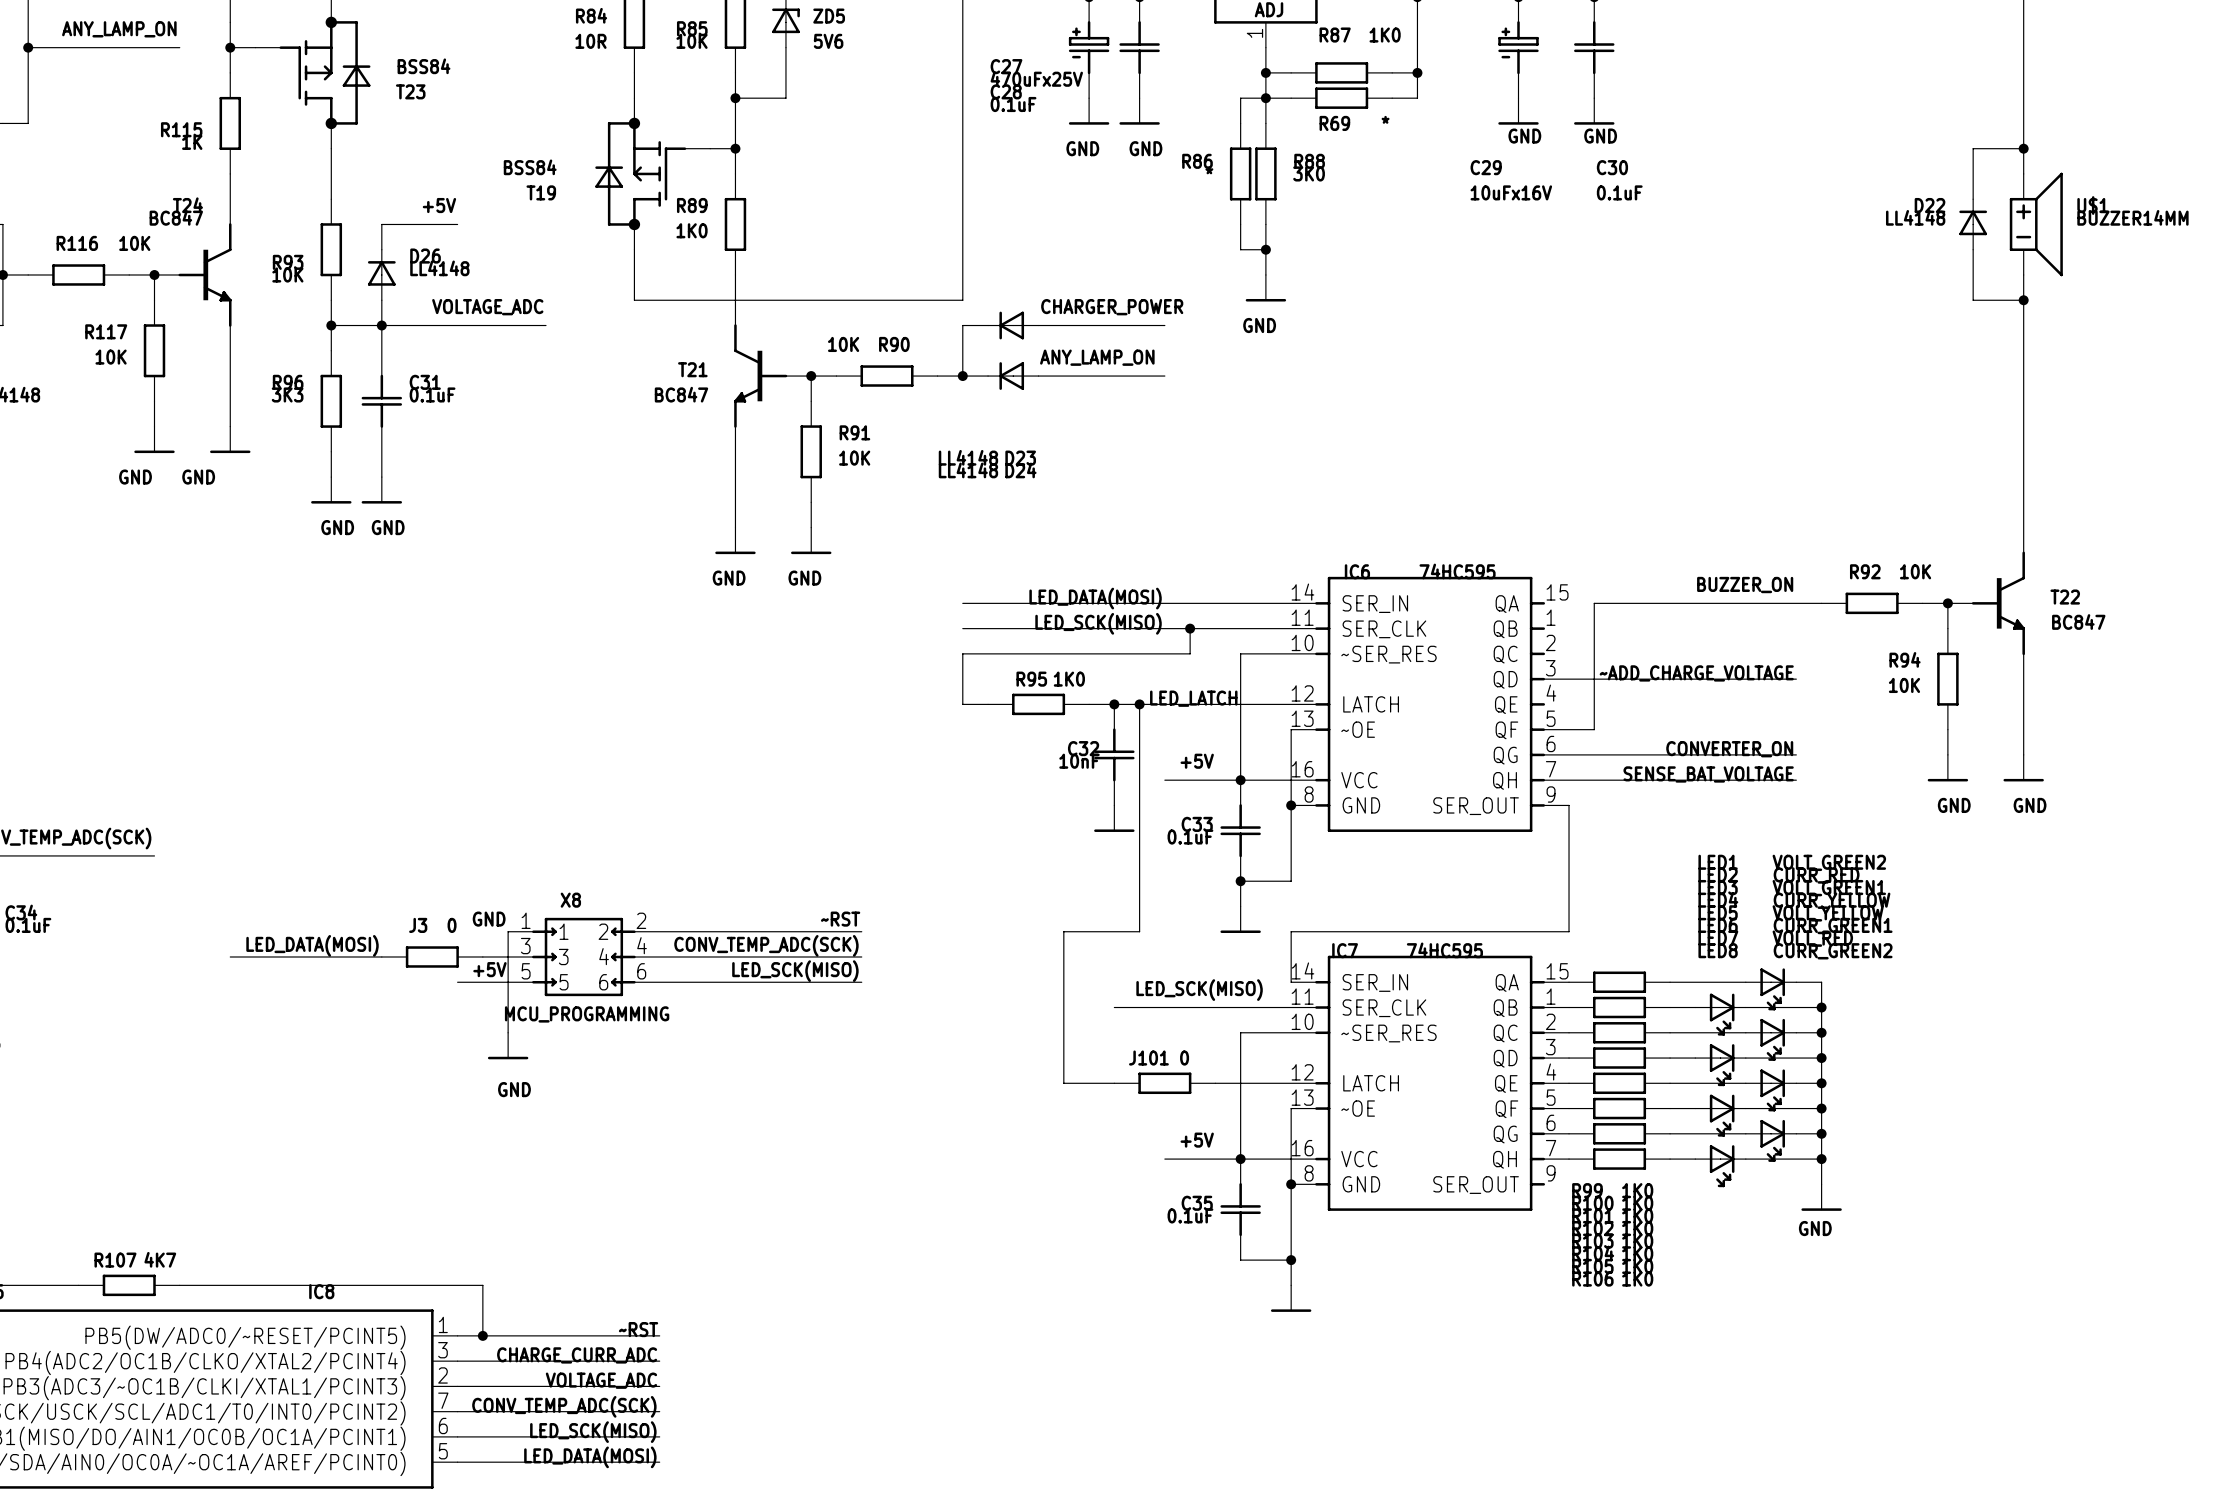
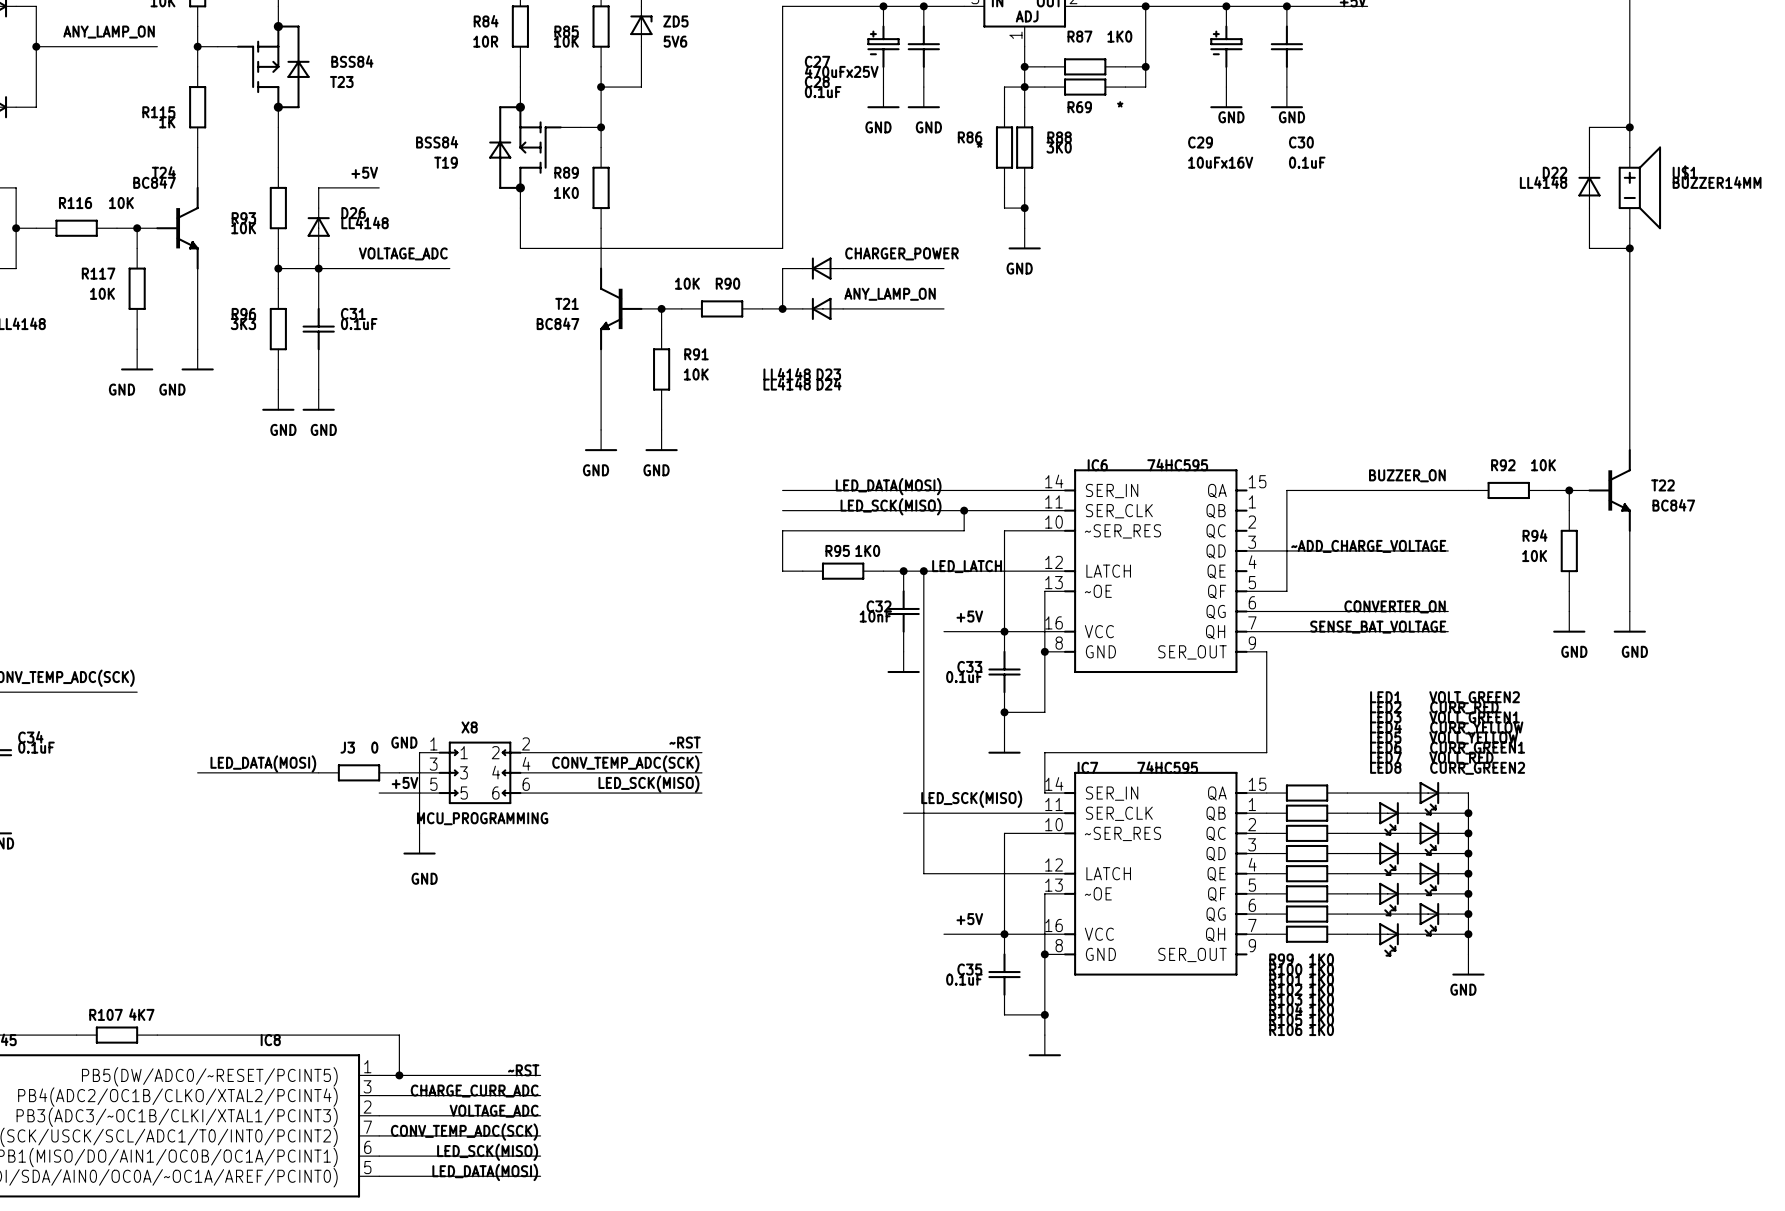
wire: (1139, 931) (1063, 931) (1063, 1083) (1114, 1083) -> (923, 752) (923, 873) (984, 873)
J101: 0 (1164, 1083) -> none

